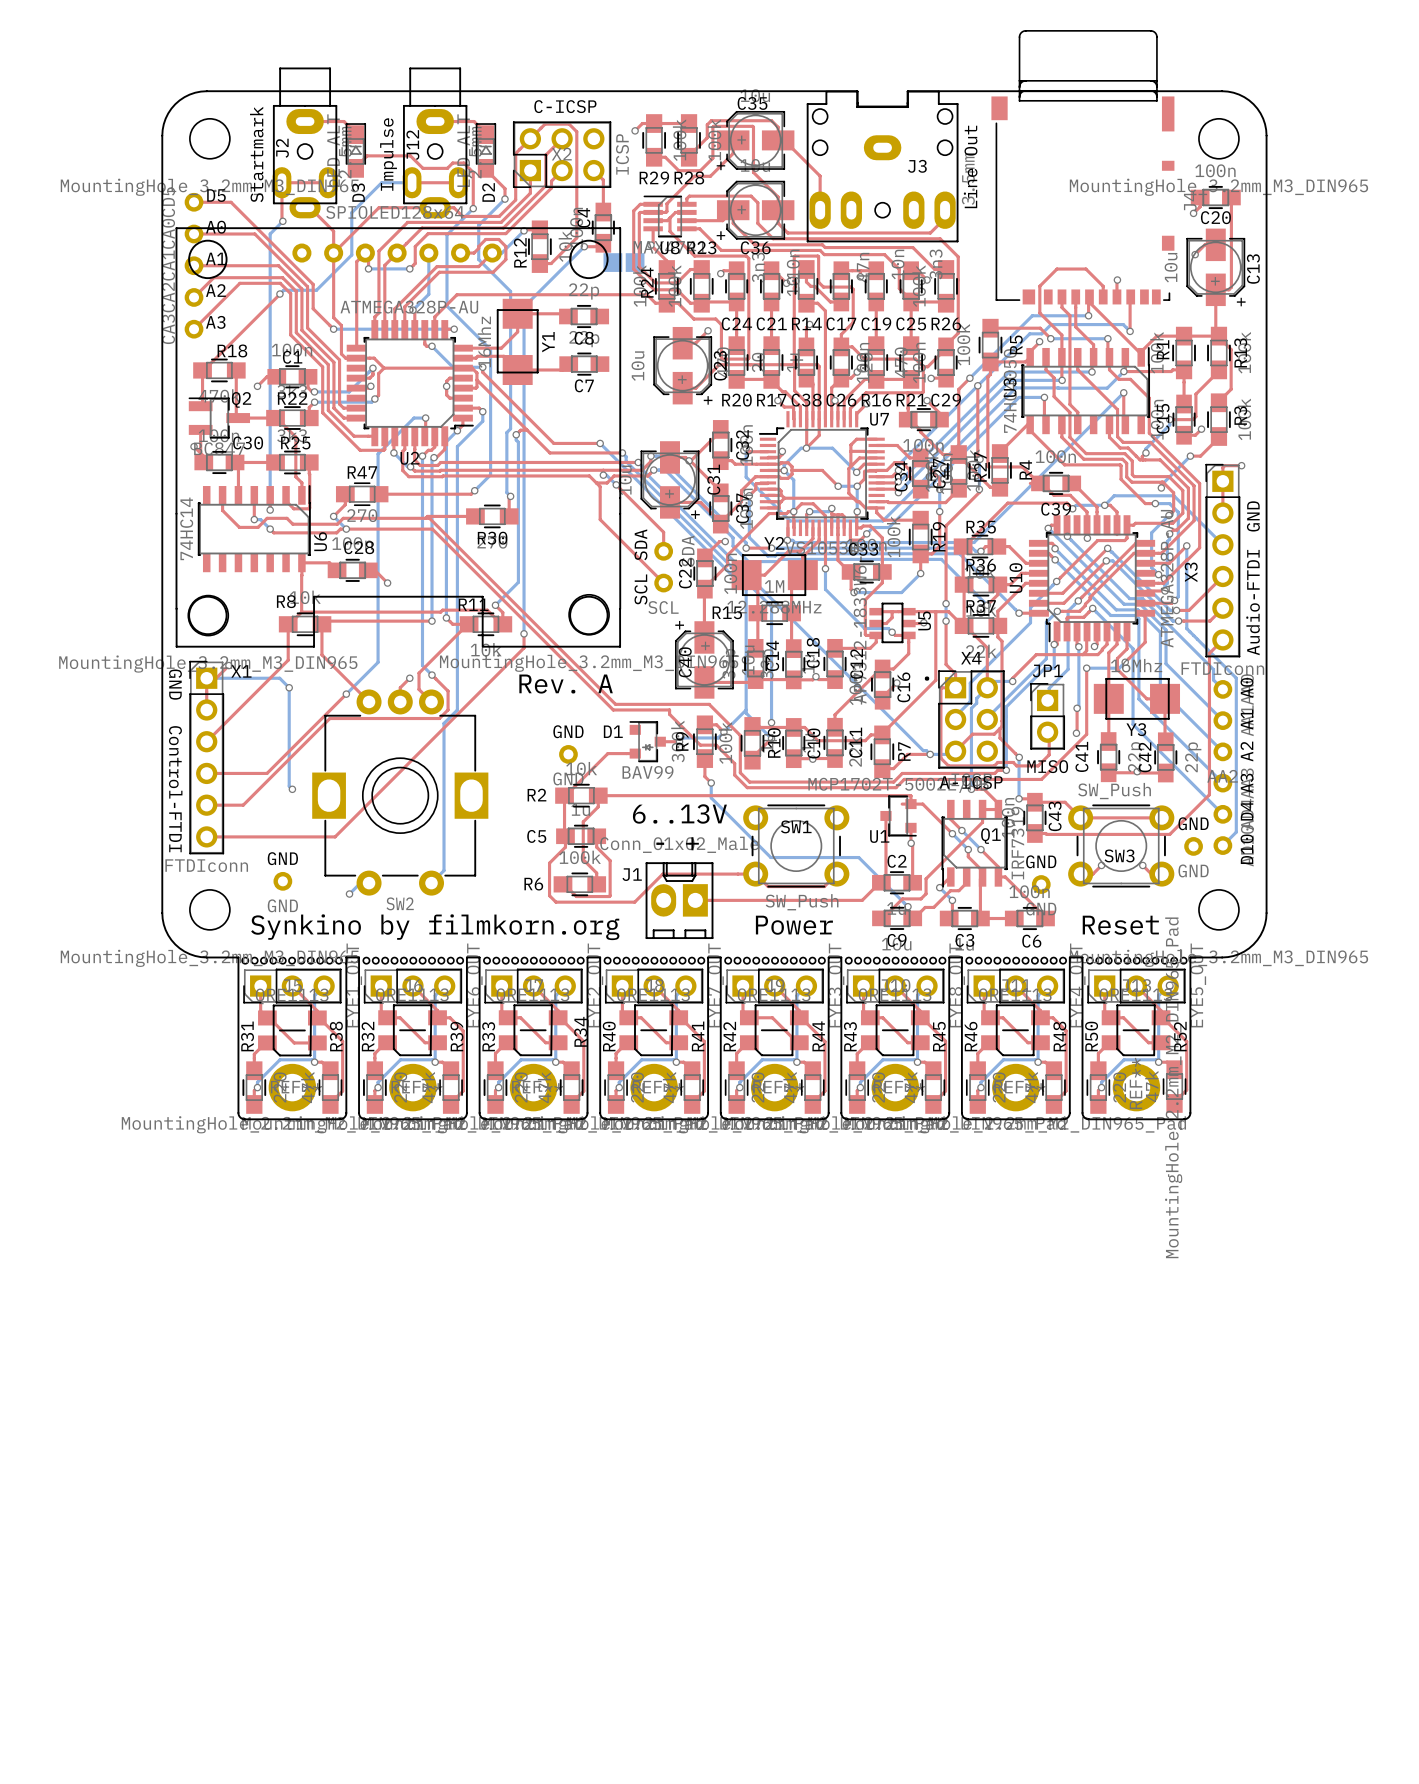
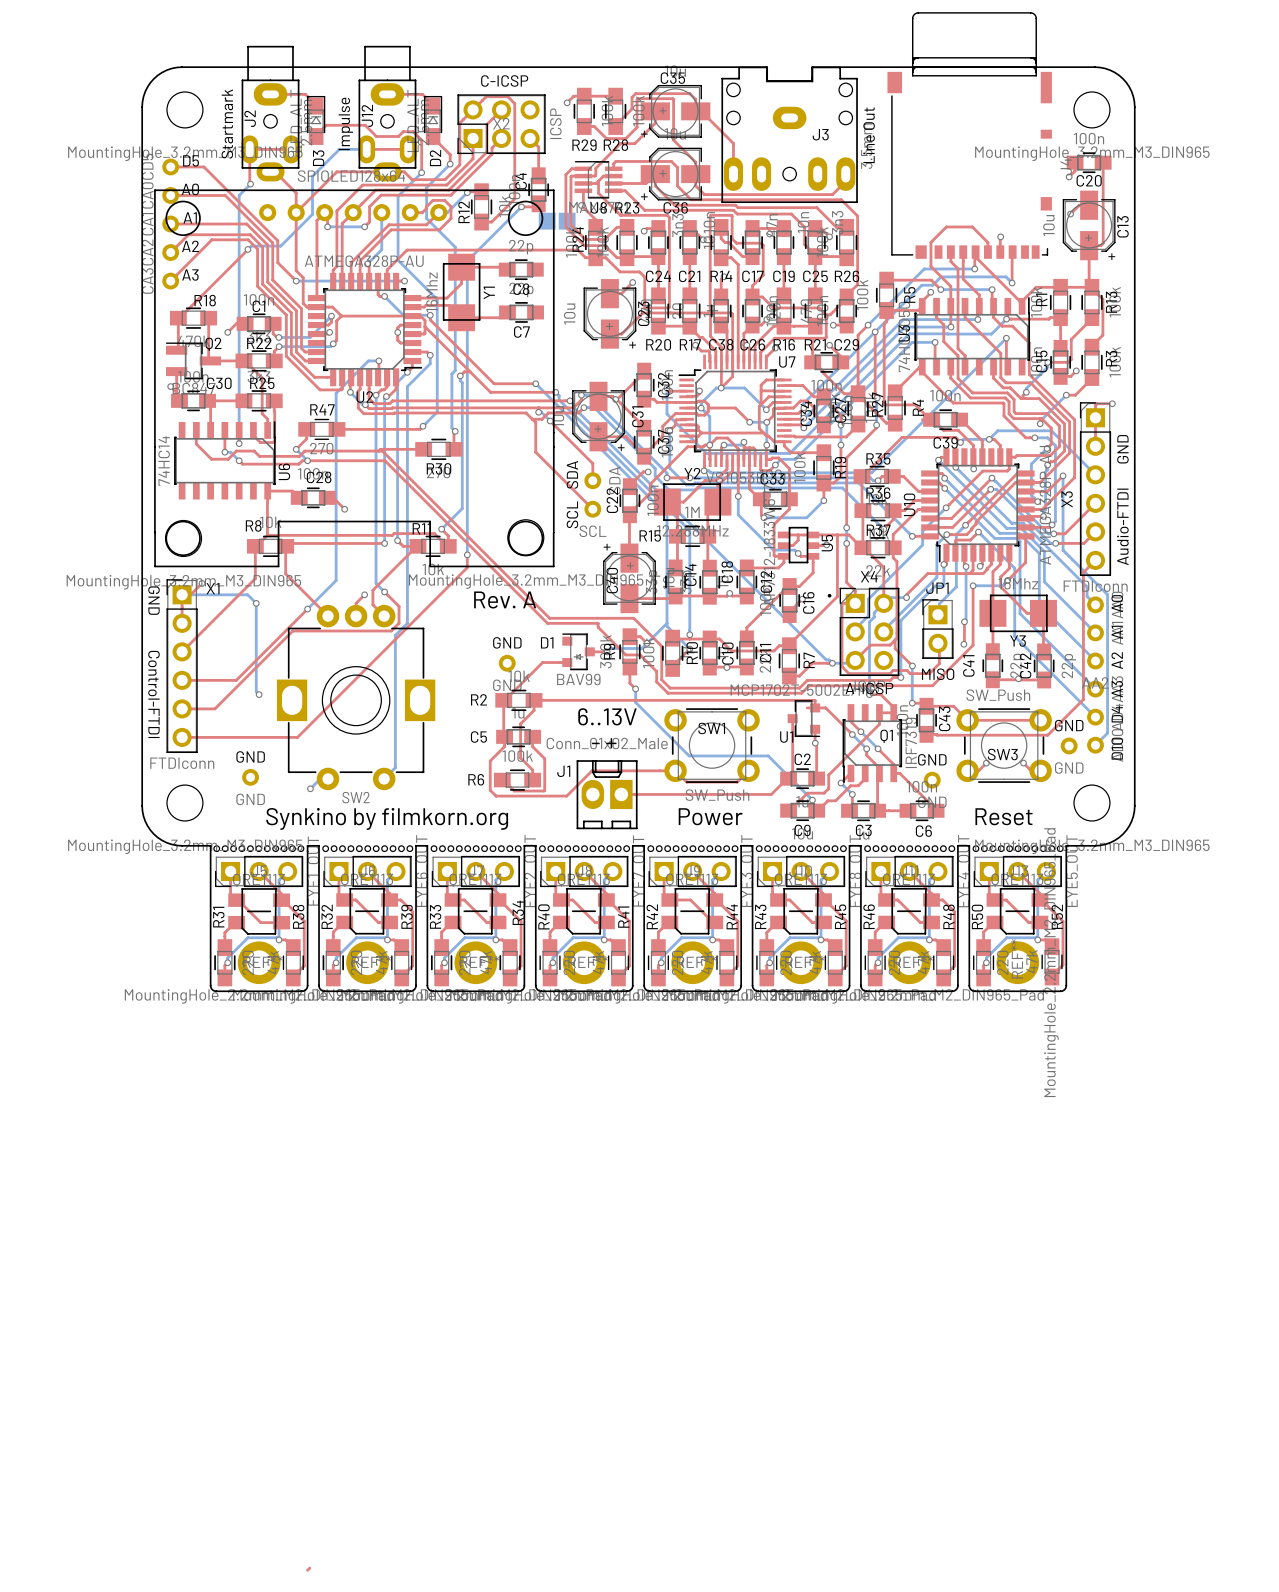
top track: none -> (309, 1568) (307, 1570)

